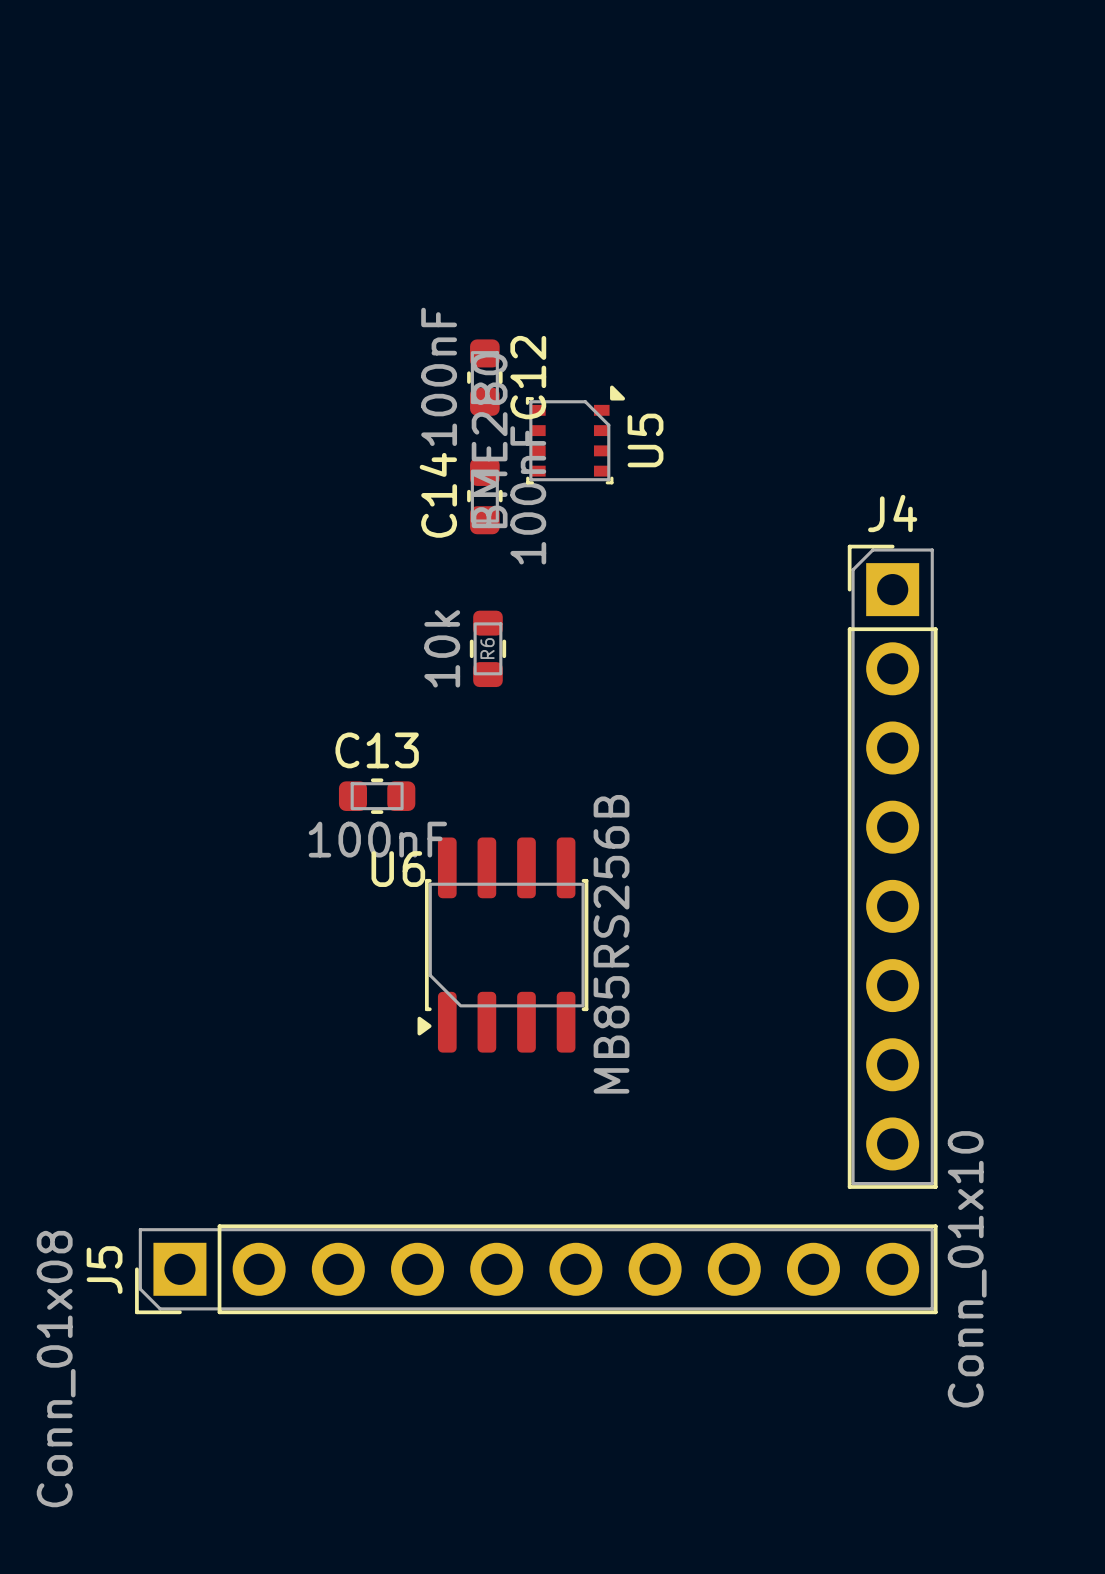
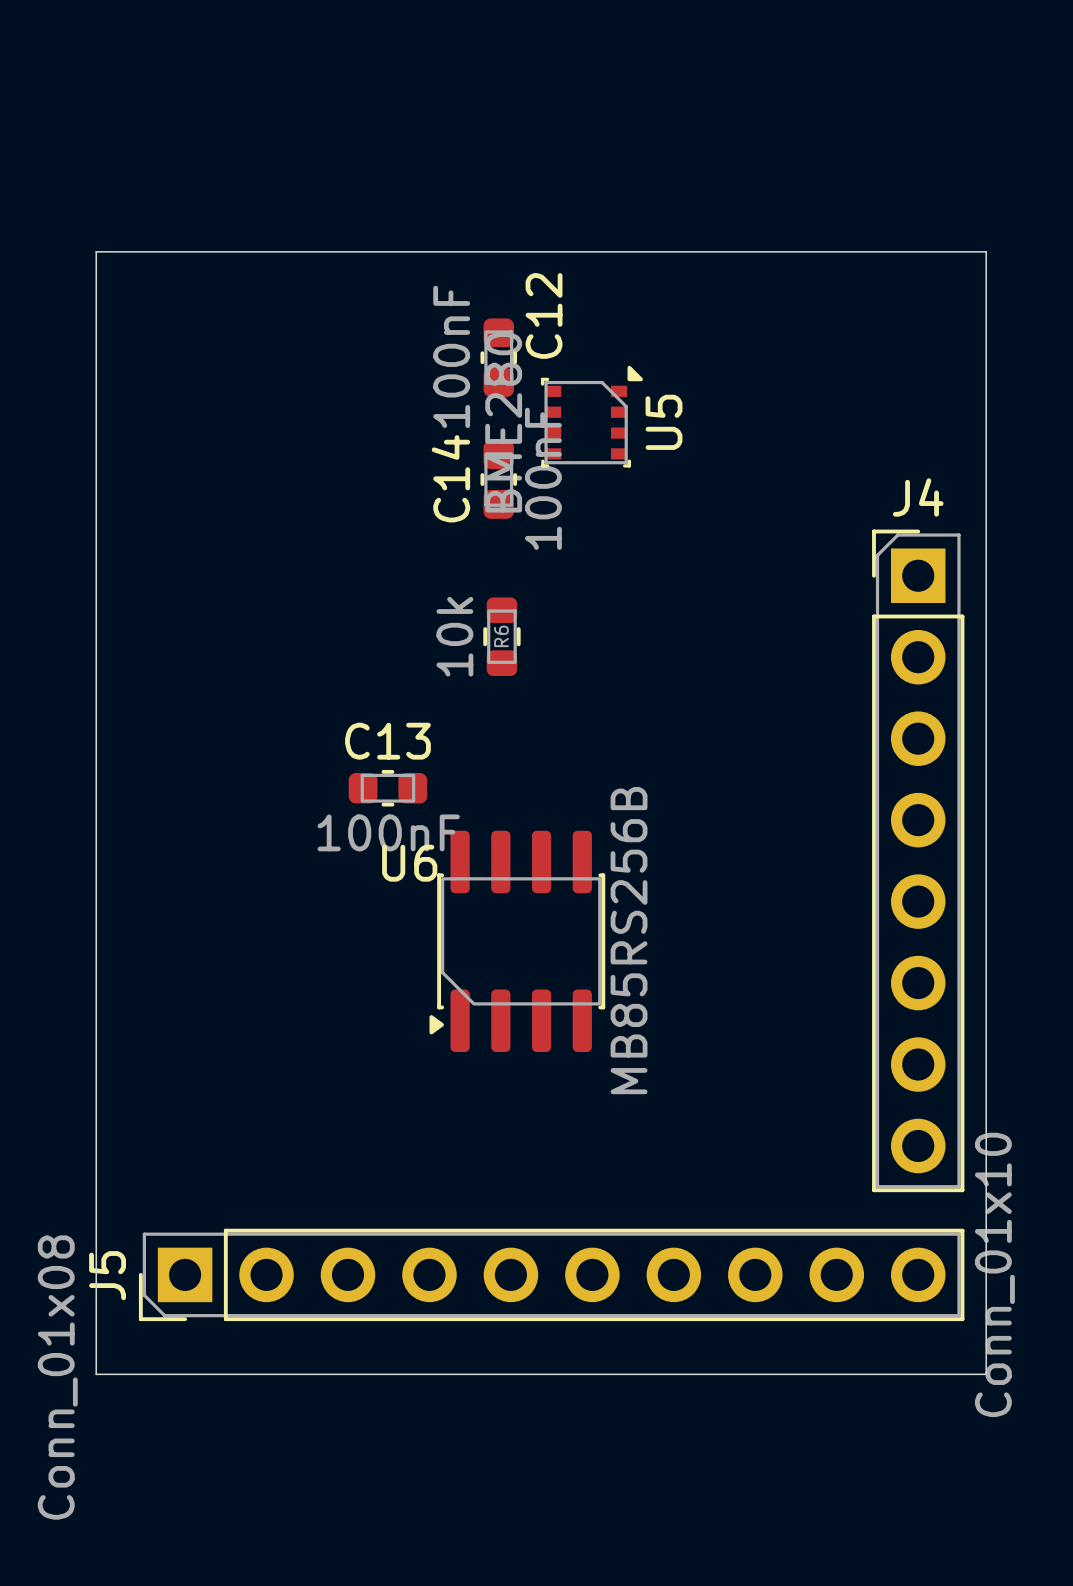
board edge: none -> (96, 251) (986, 251) (986, 1374) (96, 1374) (96, 251)
C12 name position: C12 (528, 377) -> C12 (544, 315)

